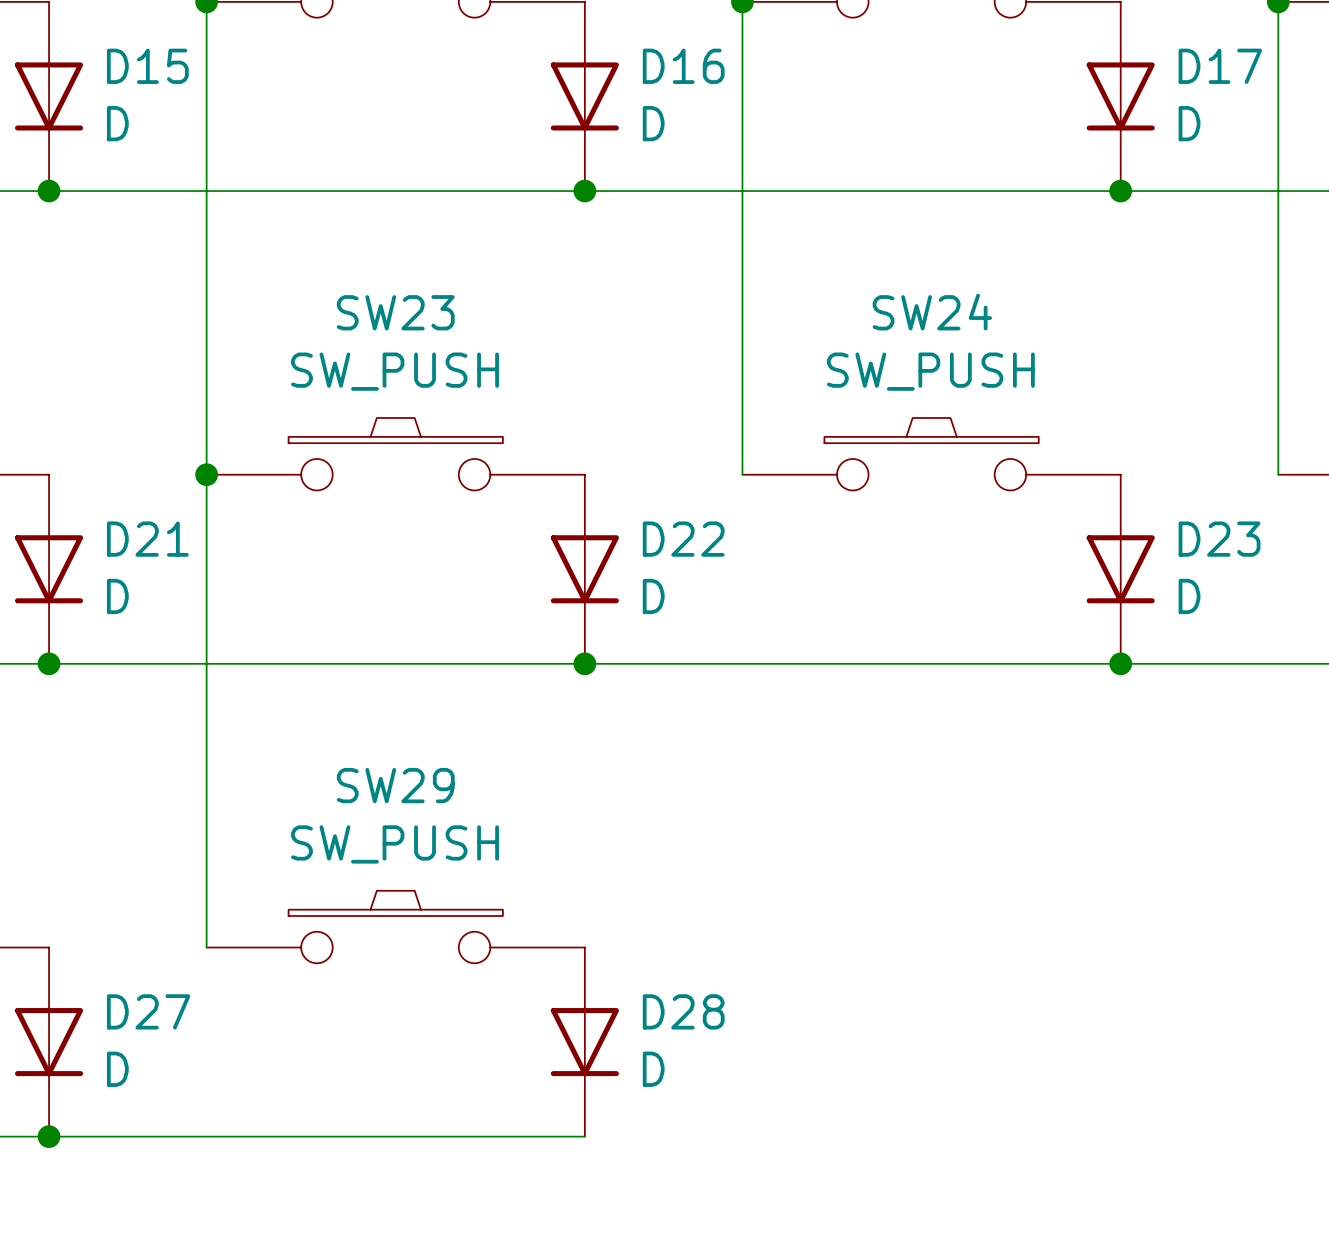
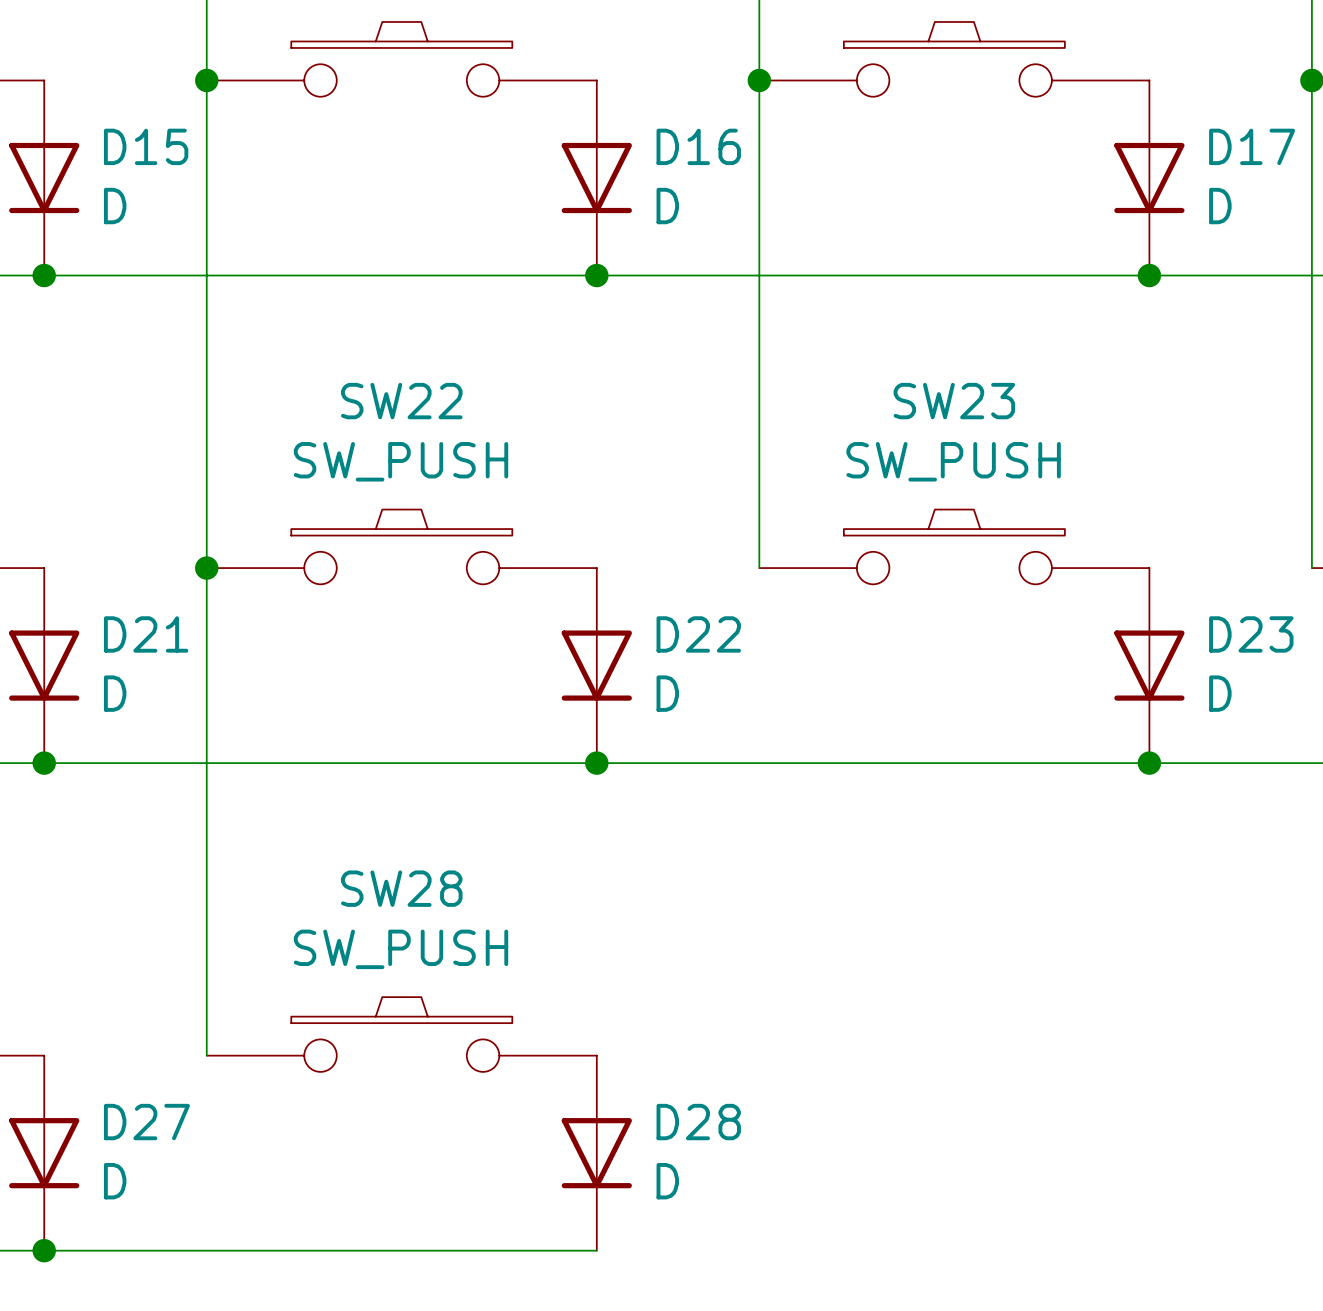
SW23 name: SW23 (395, 312) -> SW22 (401, 401)
SW24 name: SW24 (932, 312) -> SW23 (954, 401)
SW29 name: SW29 (395, 785) -> SW28 (401, 888)

